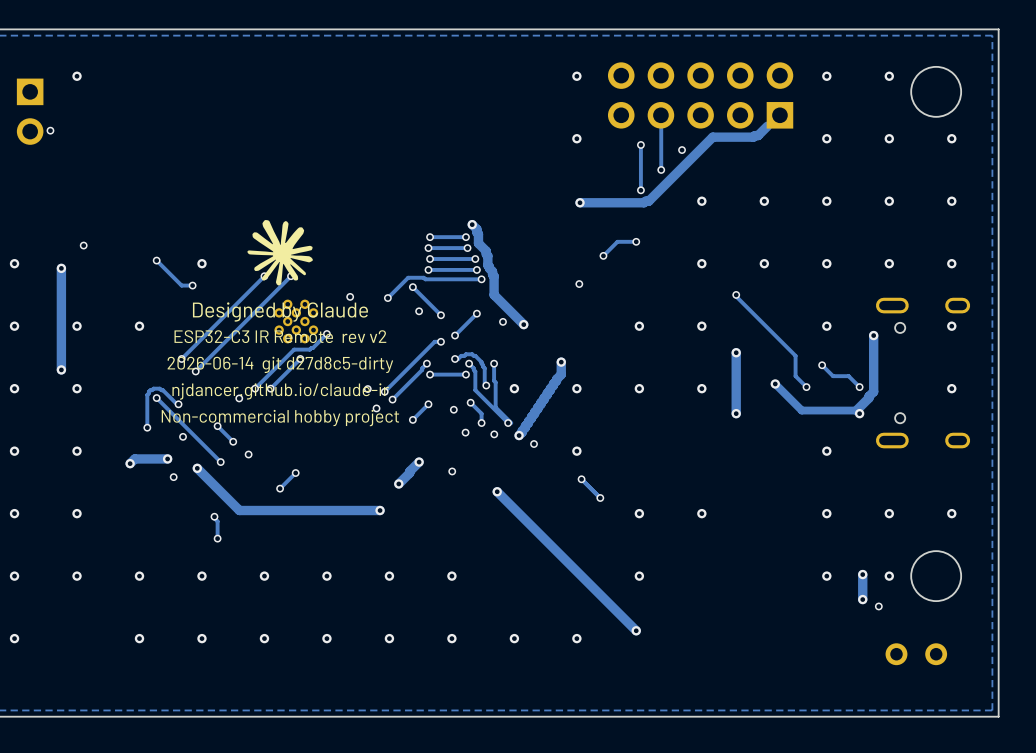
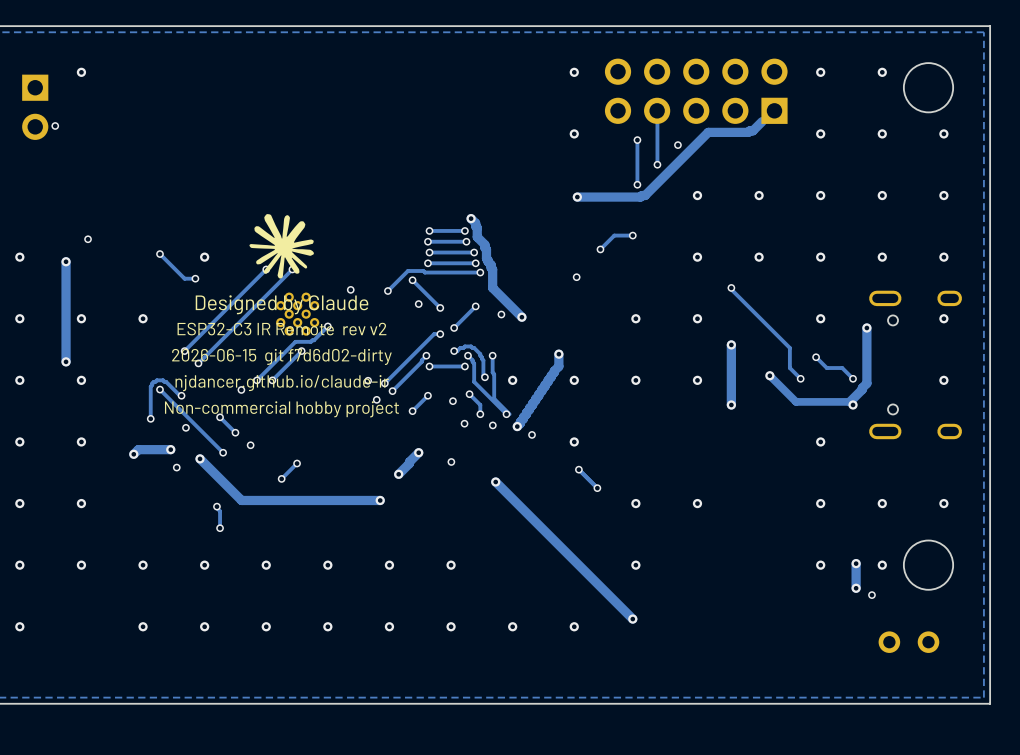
text: 2026-06-14 git d27d8c5-dirty (280, 364) -> 2026-06-15 git f7d6d02-dirty (281, 356)

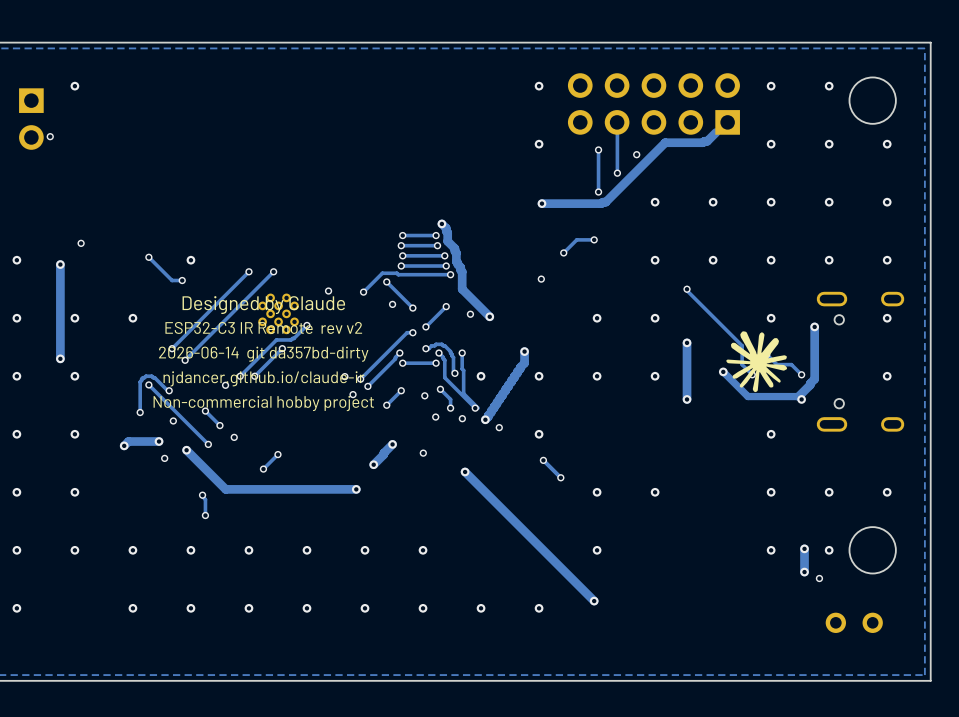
drawing: [249, 214, 314, 279] -> none
drawing: none -> [726, 331, 788, 393]
text: 2026-06-15 git f7d6d02-dirty (281, 356) -> 2026-06-14 git da357bd-dirty (263, 354)

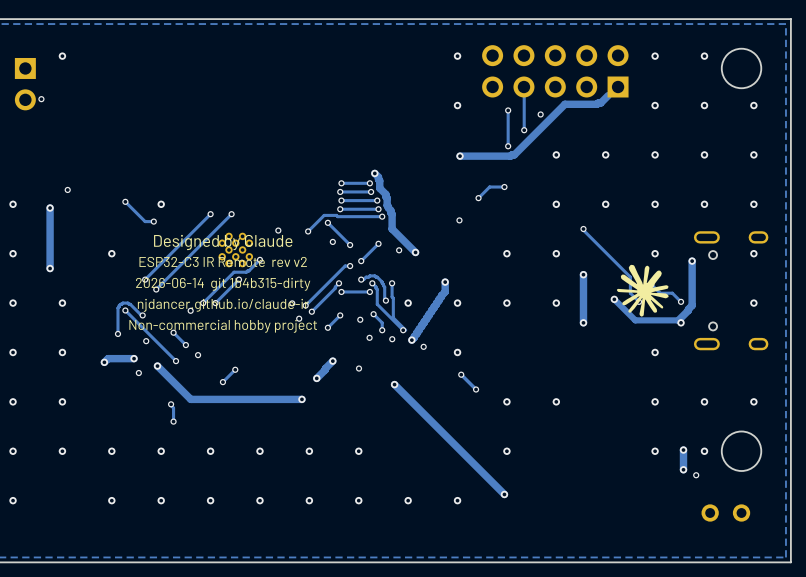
via: (74, 318) -> none
track: (60, 335) (60, 358) -> none
via: none -> (50, 268)
text: 2026-06-14 git da357bd-dirty (263, 354) -> 2026-06-14 git 1b4b315-dirty (223, 284)
via: (60, 358) -> none

